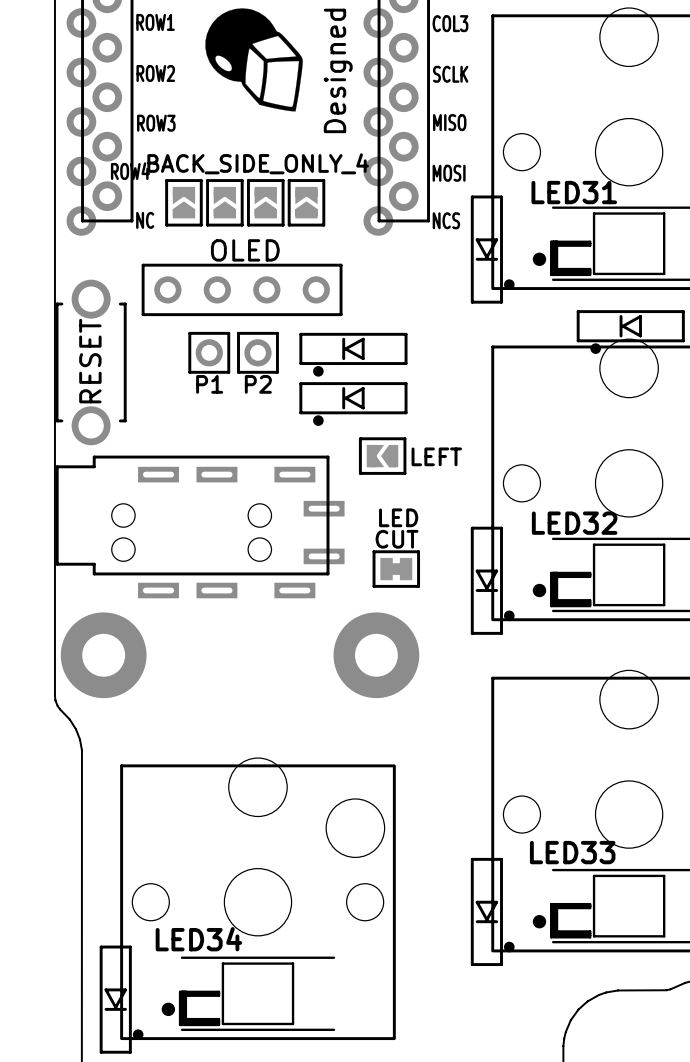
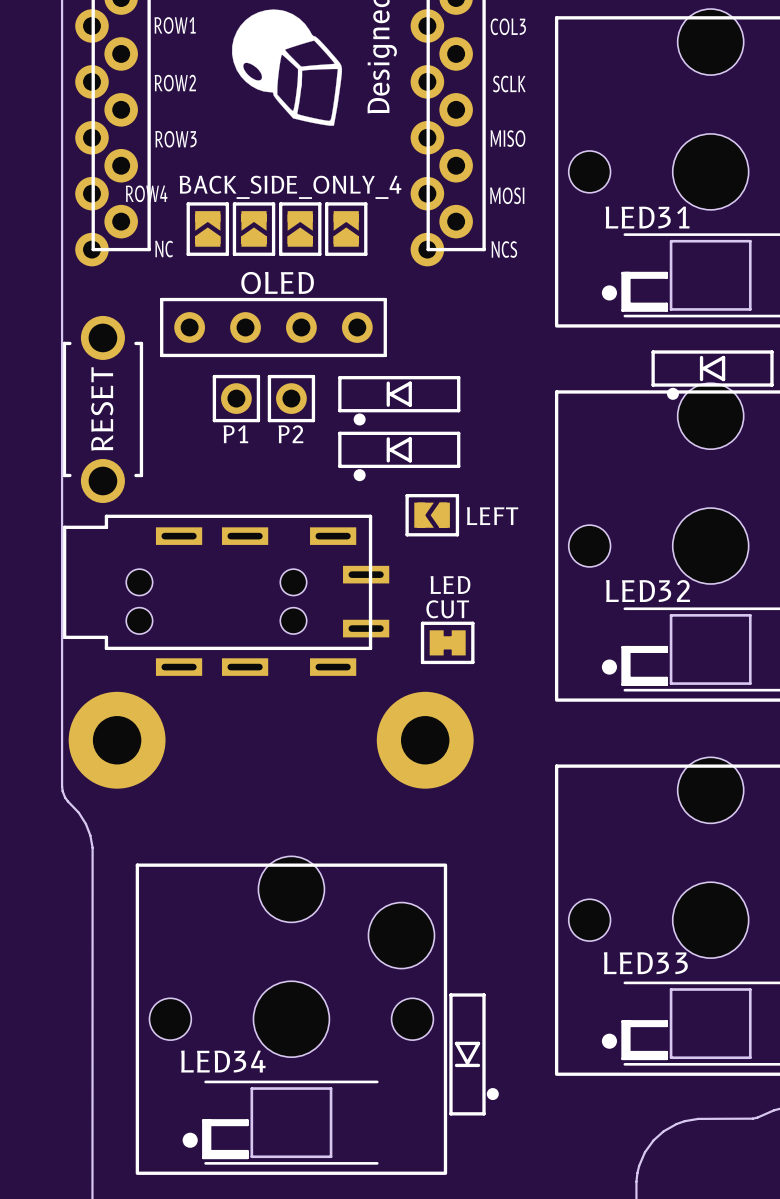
part: (492, 249) -> none
part: (492, 580) -> none
part position: (492, 911) -> (474, 1054)
part: (121, 999) -> none

